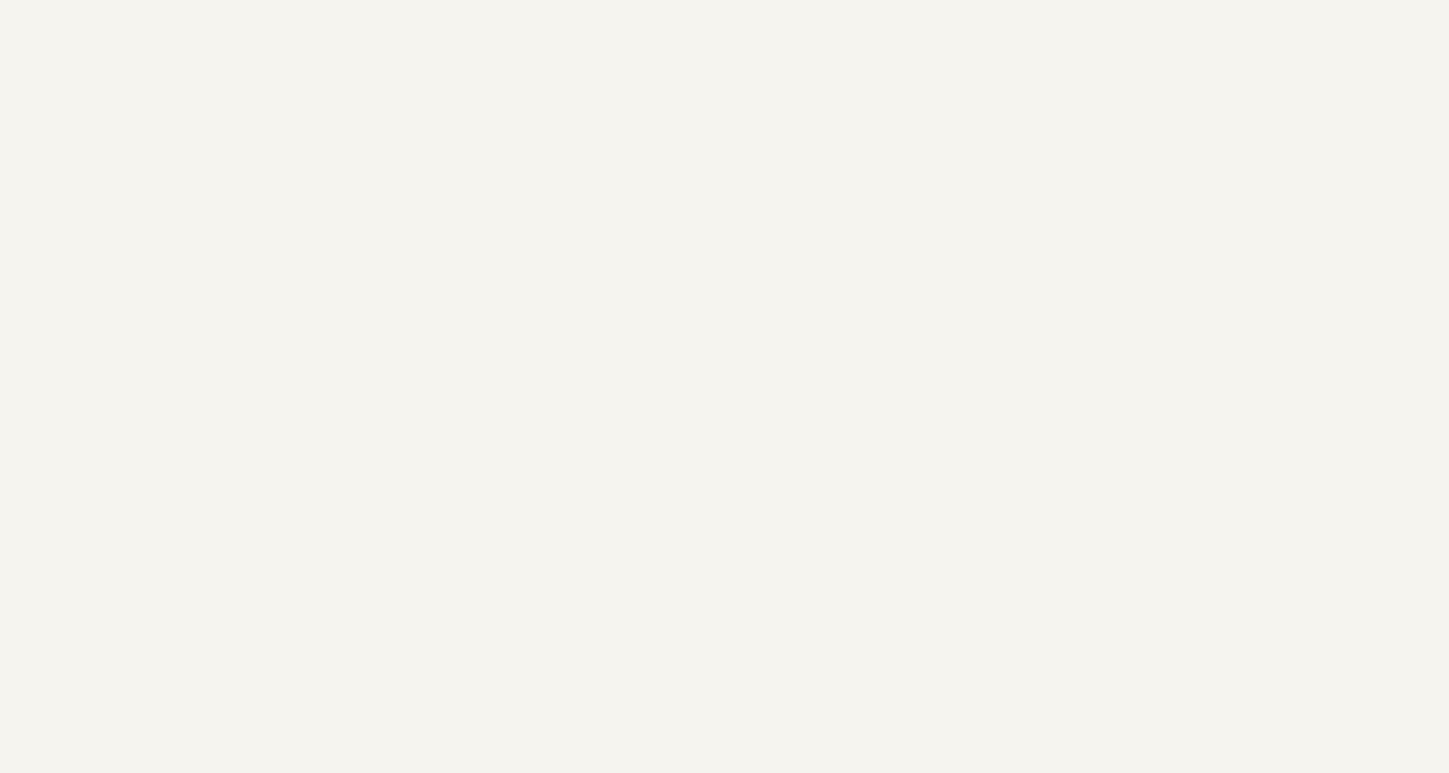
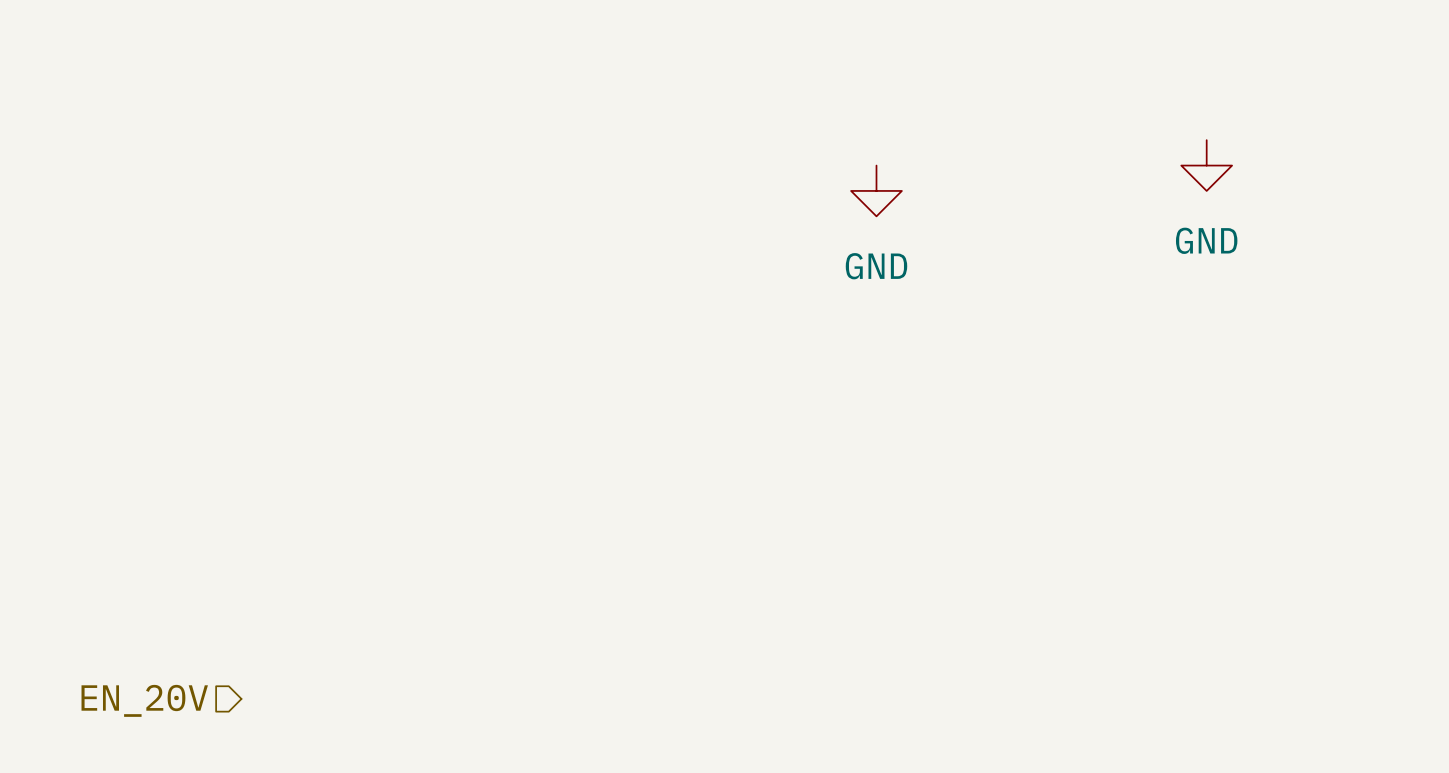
power symbol: none -> GND (1206, 165)
power symbol: none -> GND (876, 190)
hierarchical label: none -> EN_20V (144, 700)

